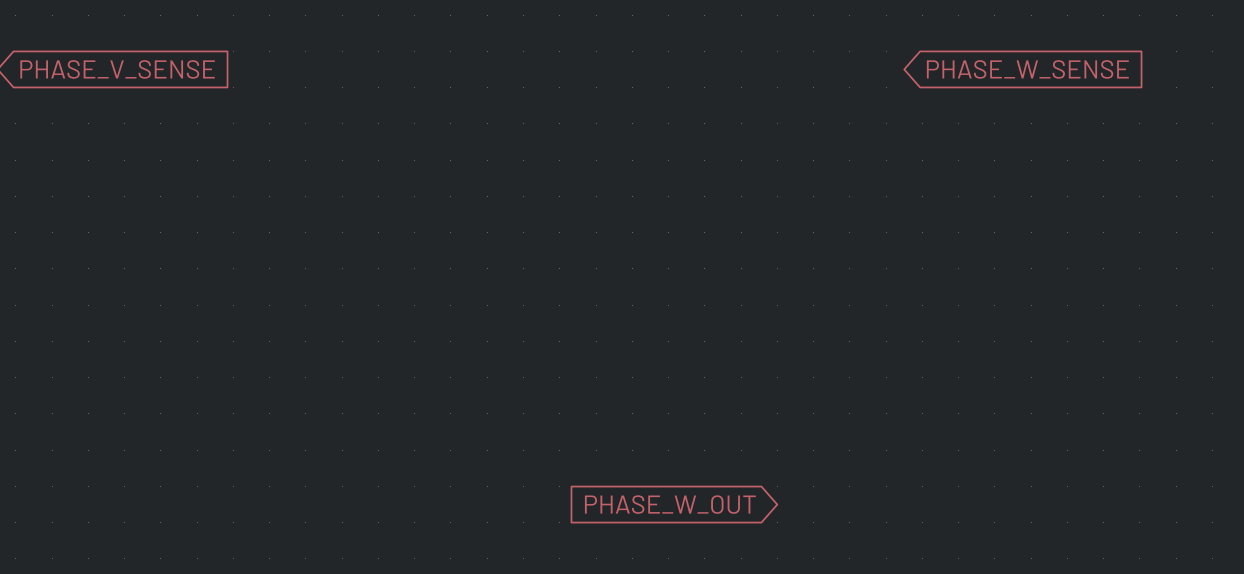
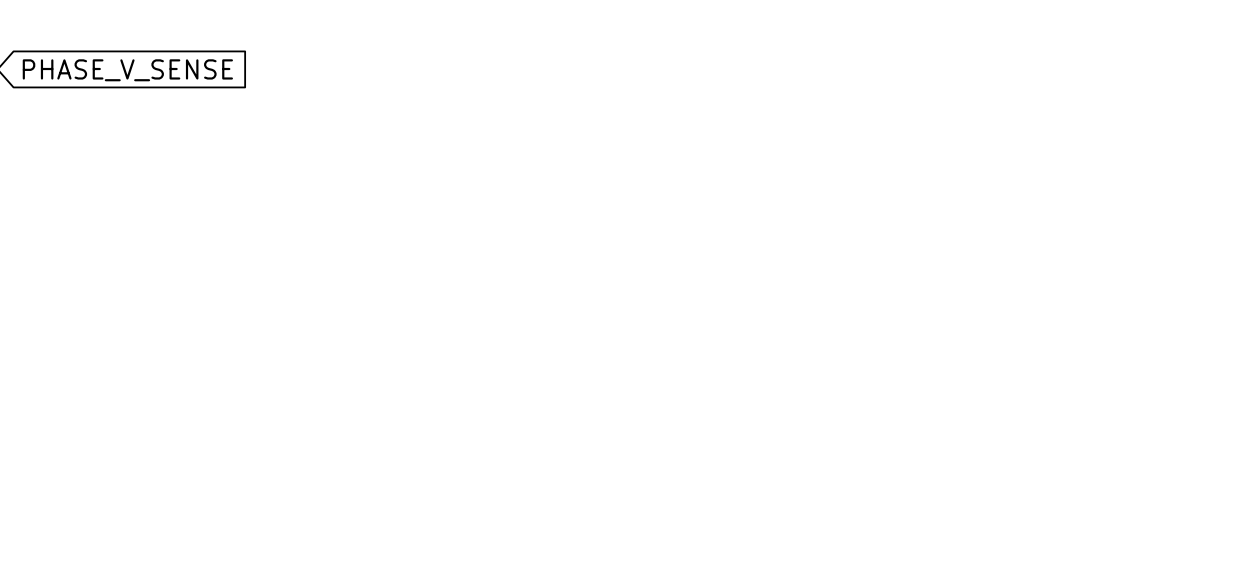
global label: PHASE_W_SENSE (1027, 69) -> none
global label: PHASE_W_OUT (670, 504) -> none

